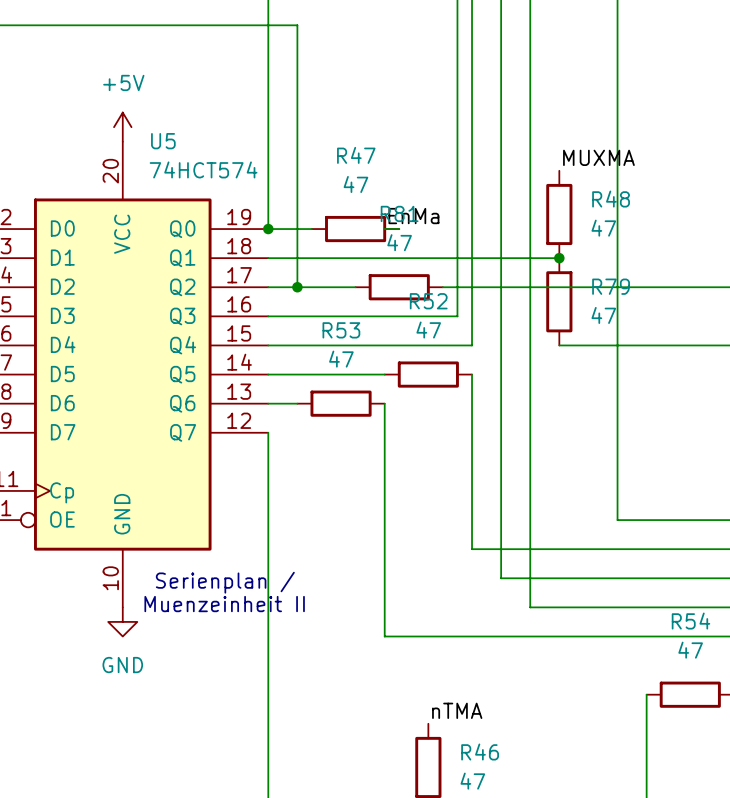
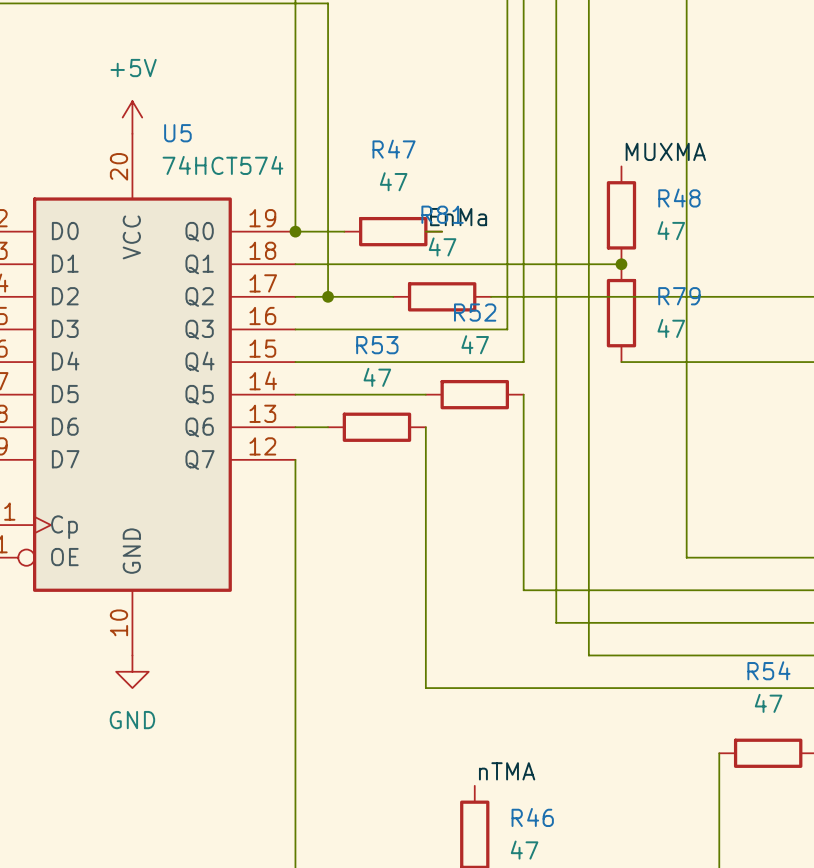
text: Serienplan / (225, 582) -> none
text: Muenzeinheit II (224, 604) -> none

